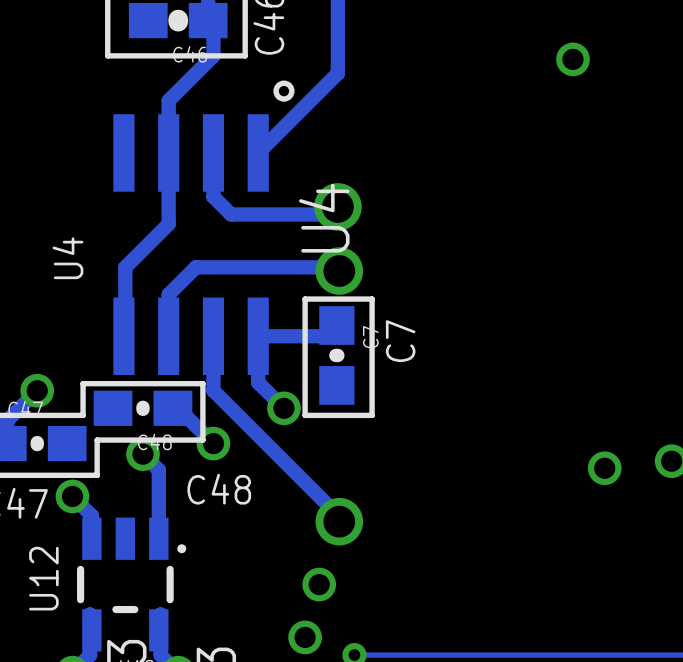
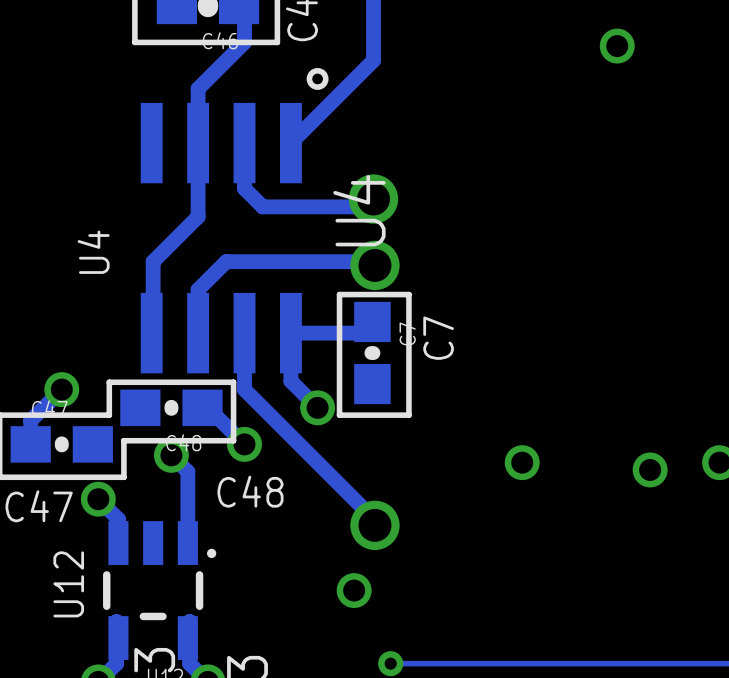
via: none -> (522, 462)
via: (305, 637) -> none

